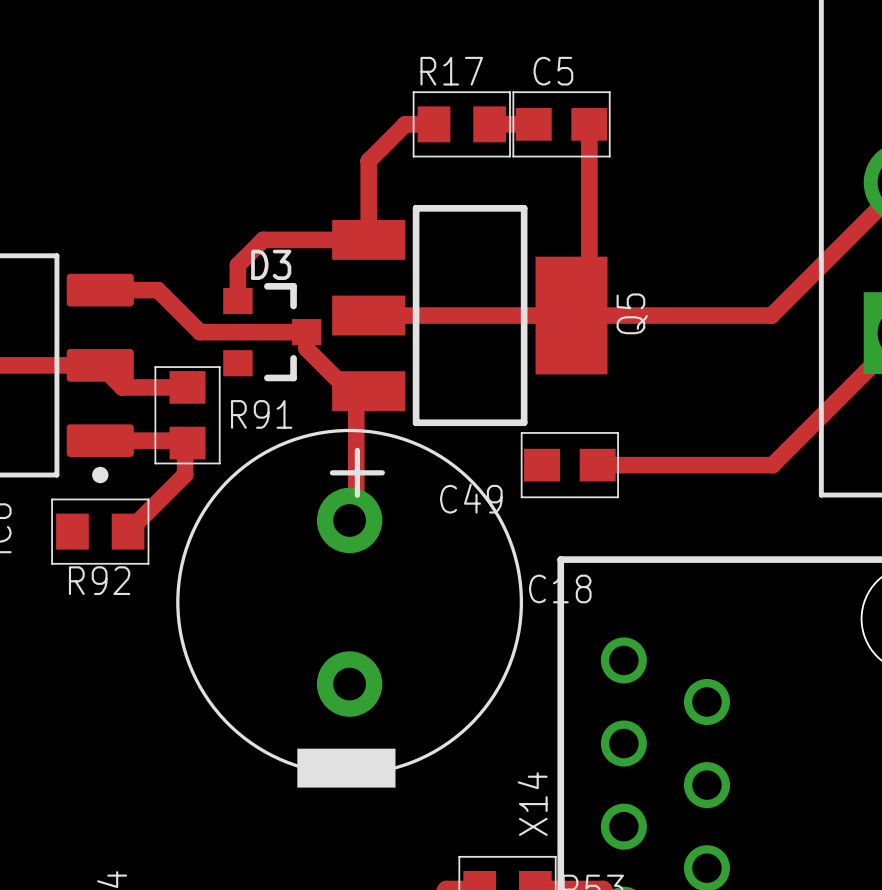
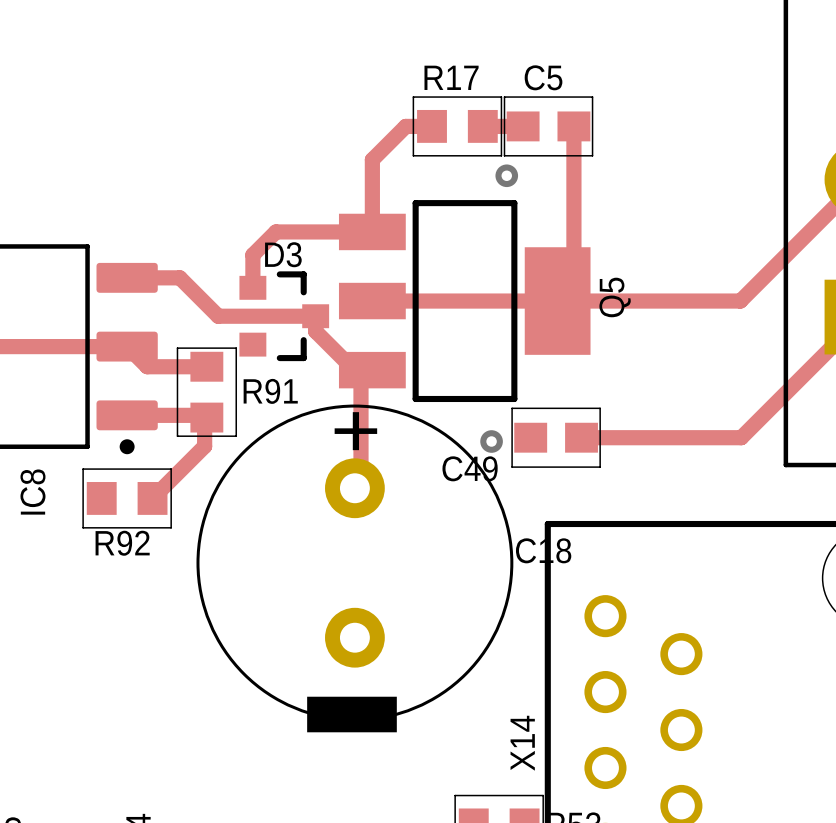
via: none -> (506, 175)
via: none -> (491, 441)

